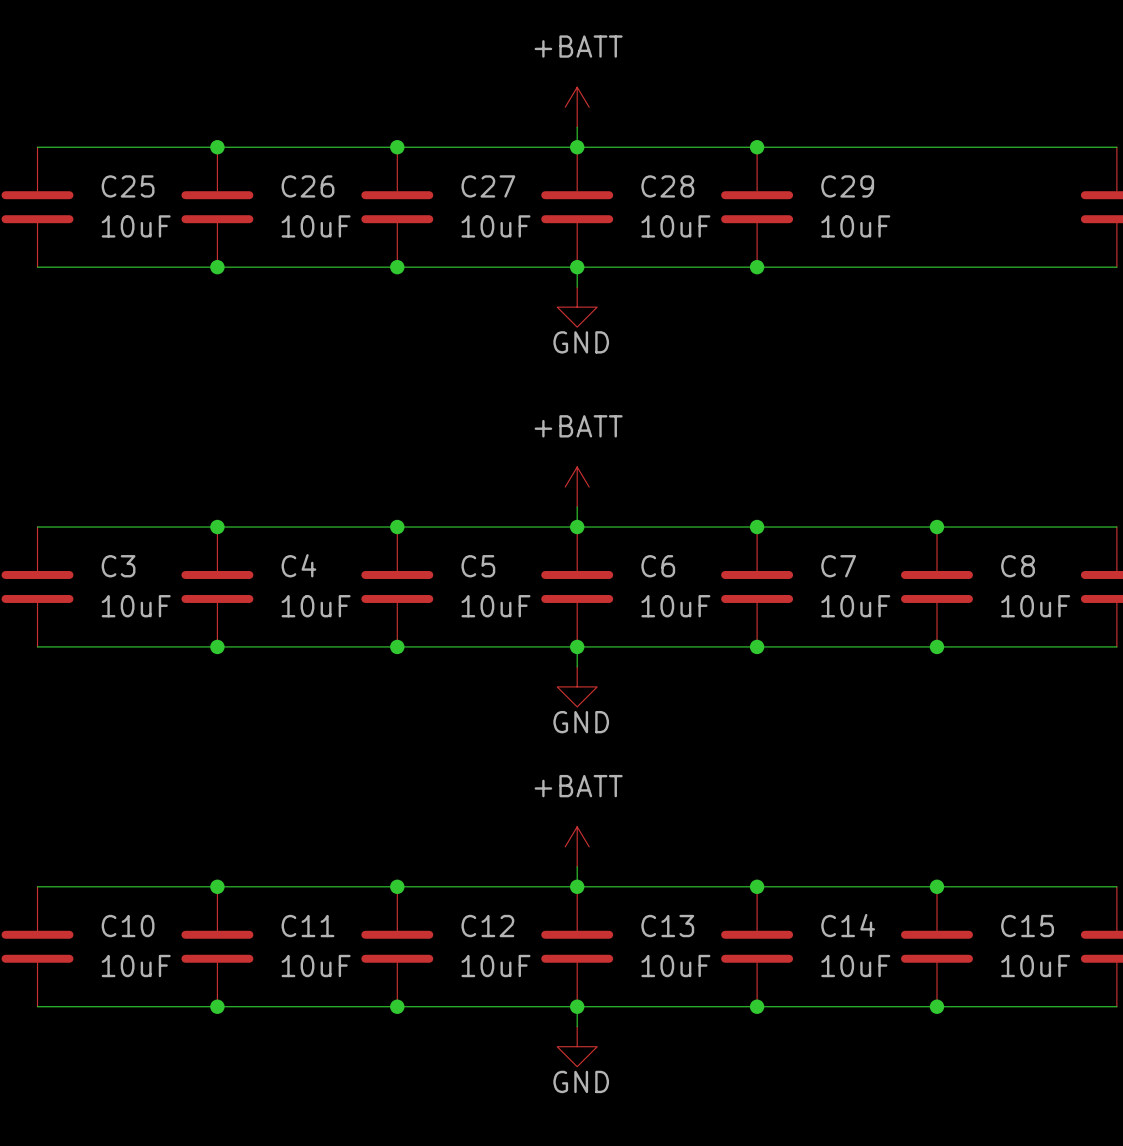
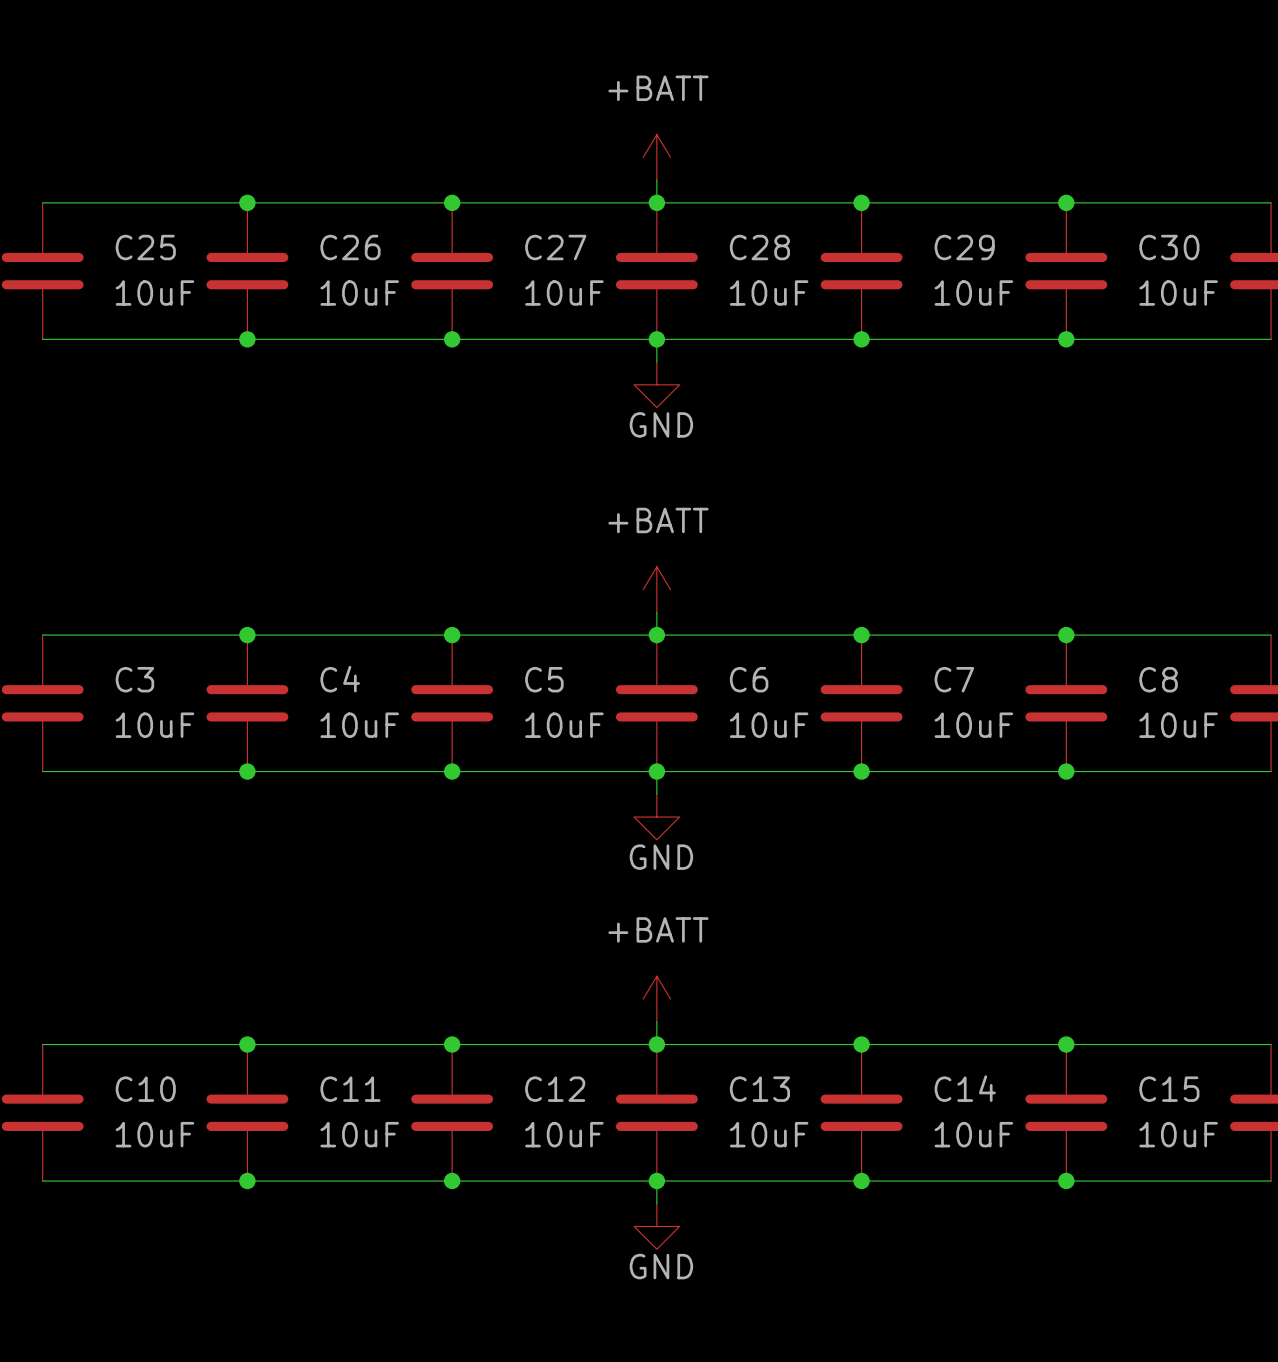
junction: none -> (1066, 202)
C30: none -> 10uF (1066, 271)
junction: none -> (1066, 339)

